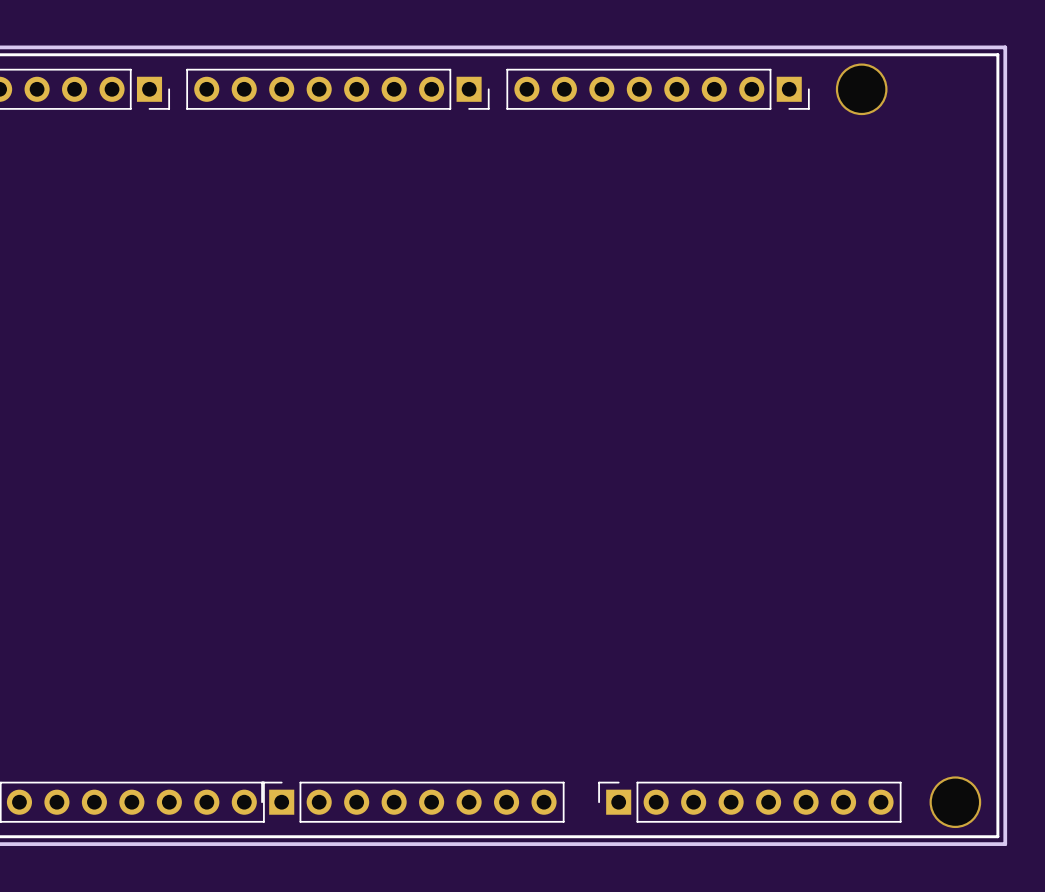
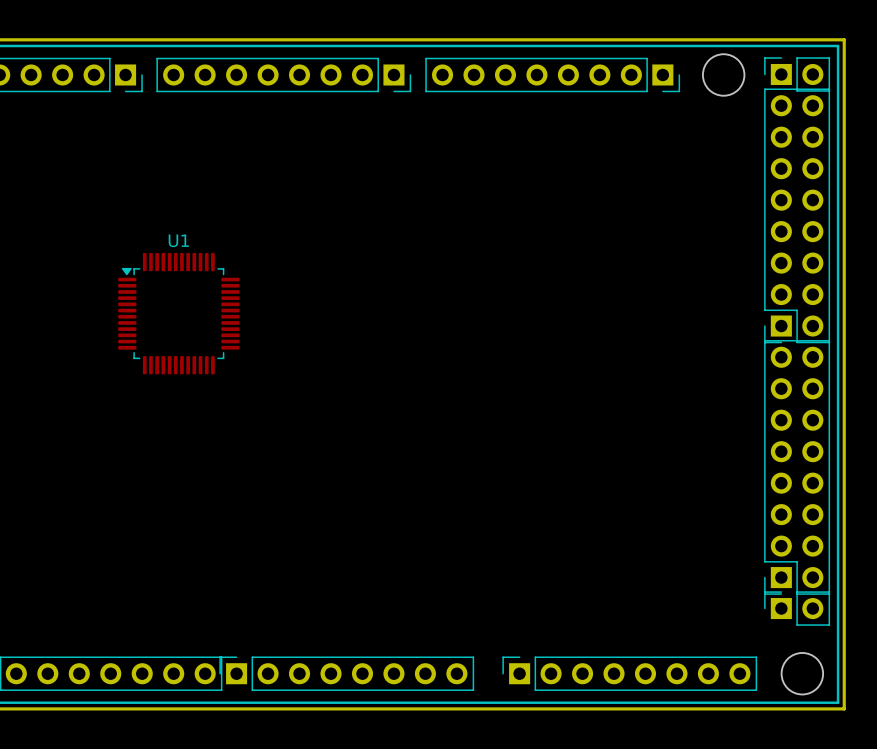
part: none -> (797, 74)
part: none -> (797, 215)
U1: none -> (178, 313)
part: none -> (797, 467)
part: none -> (797, 608)

